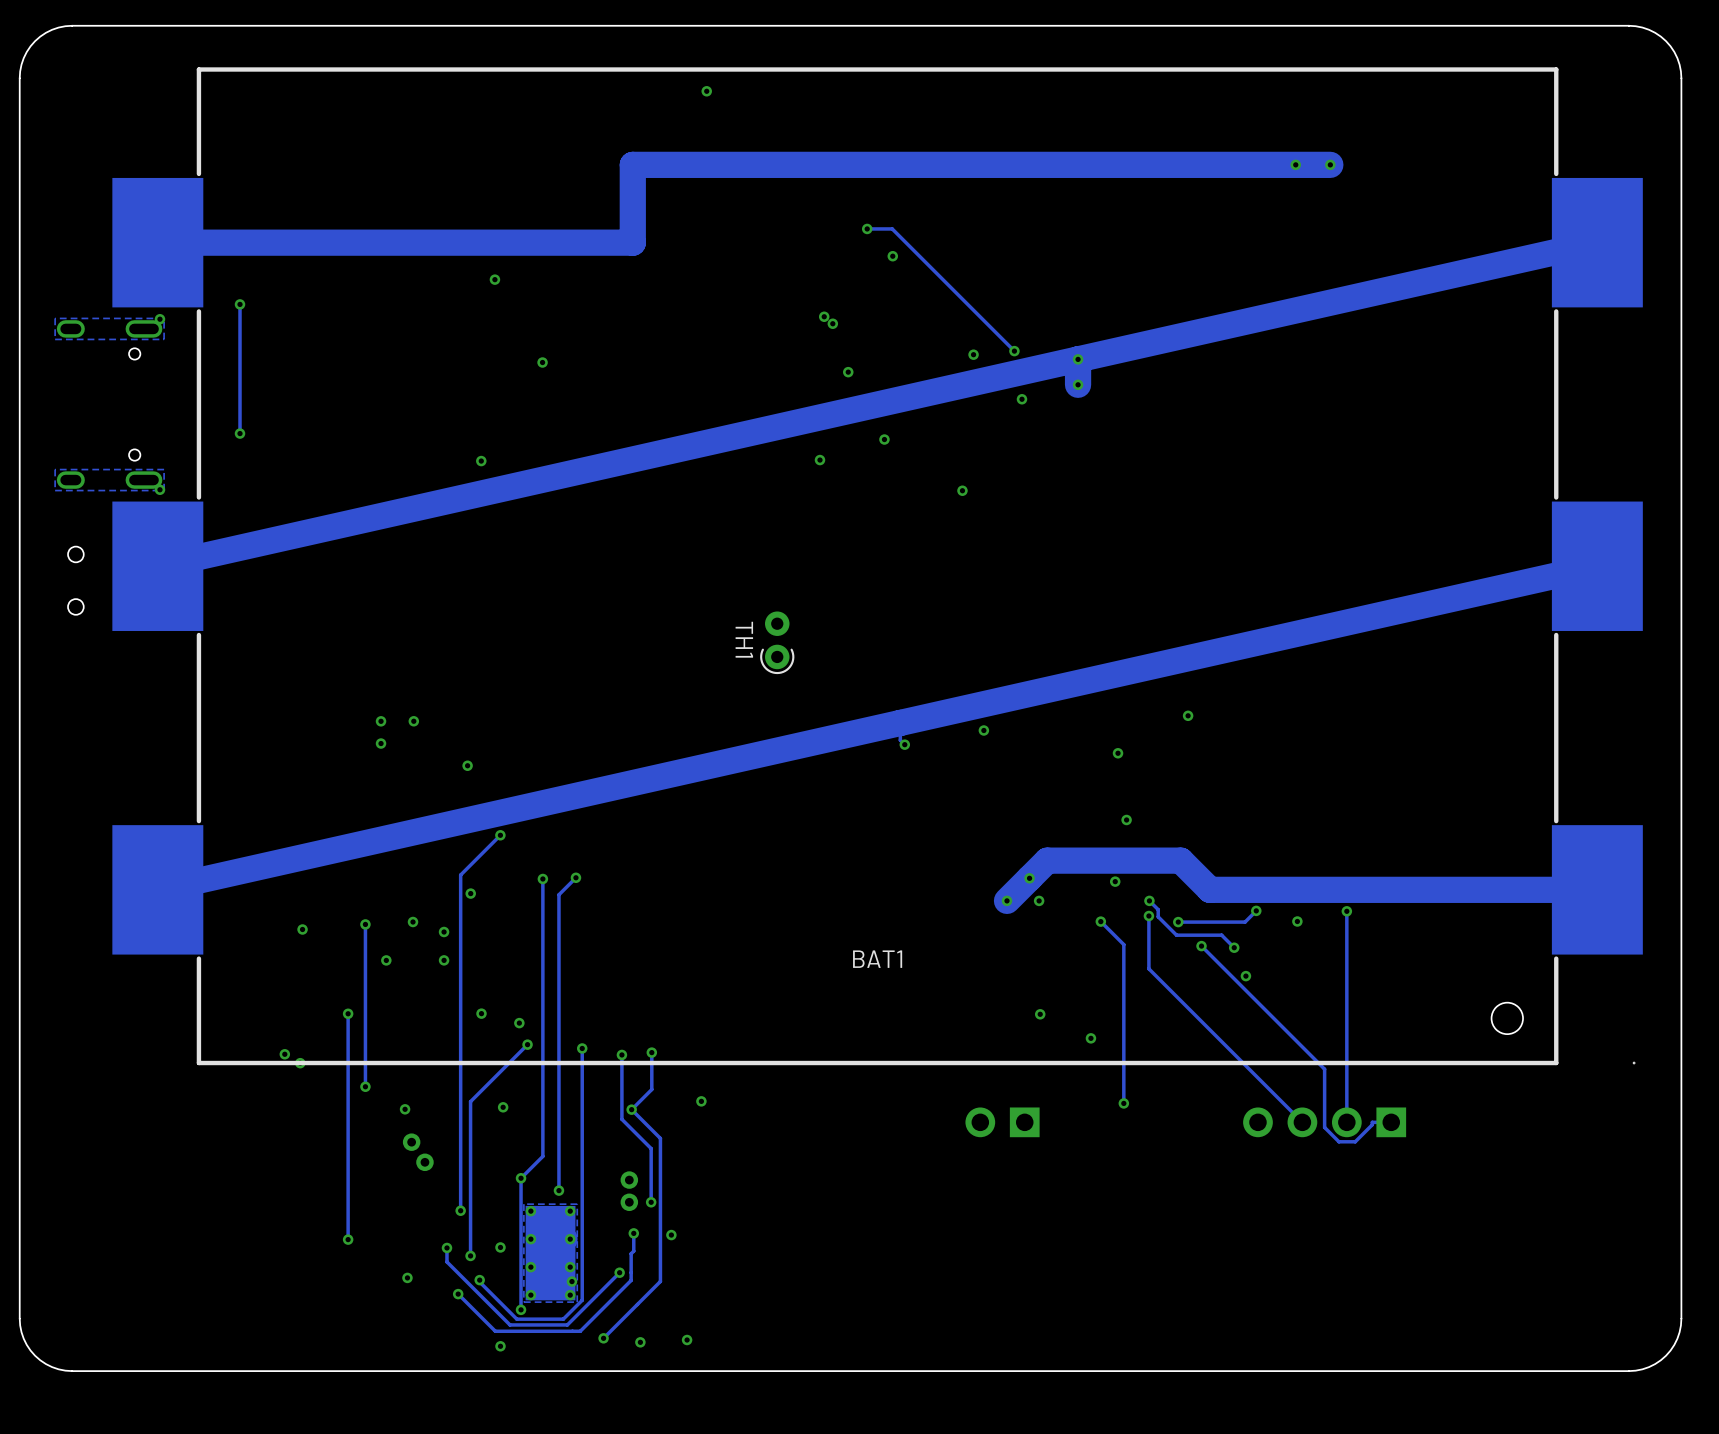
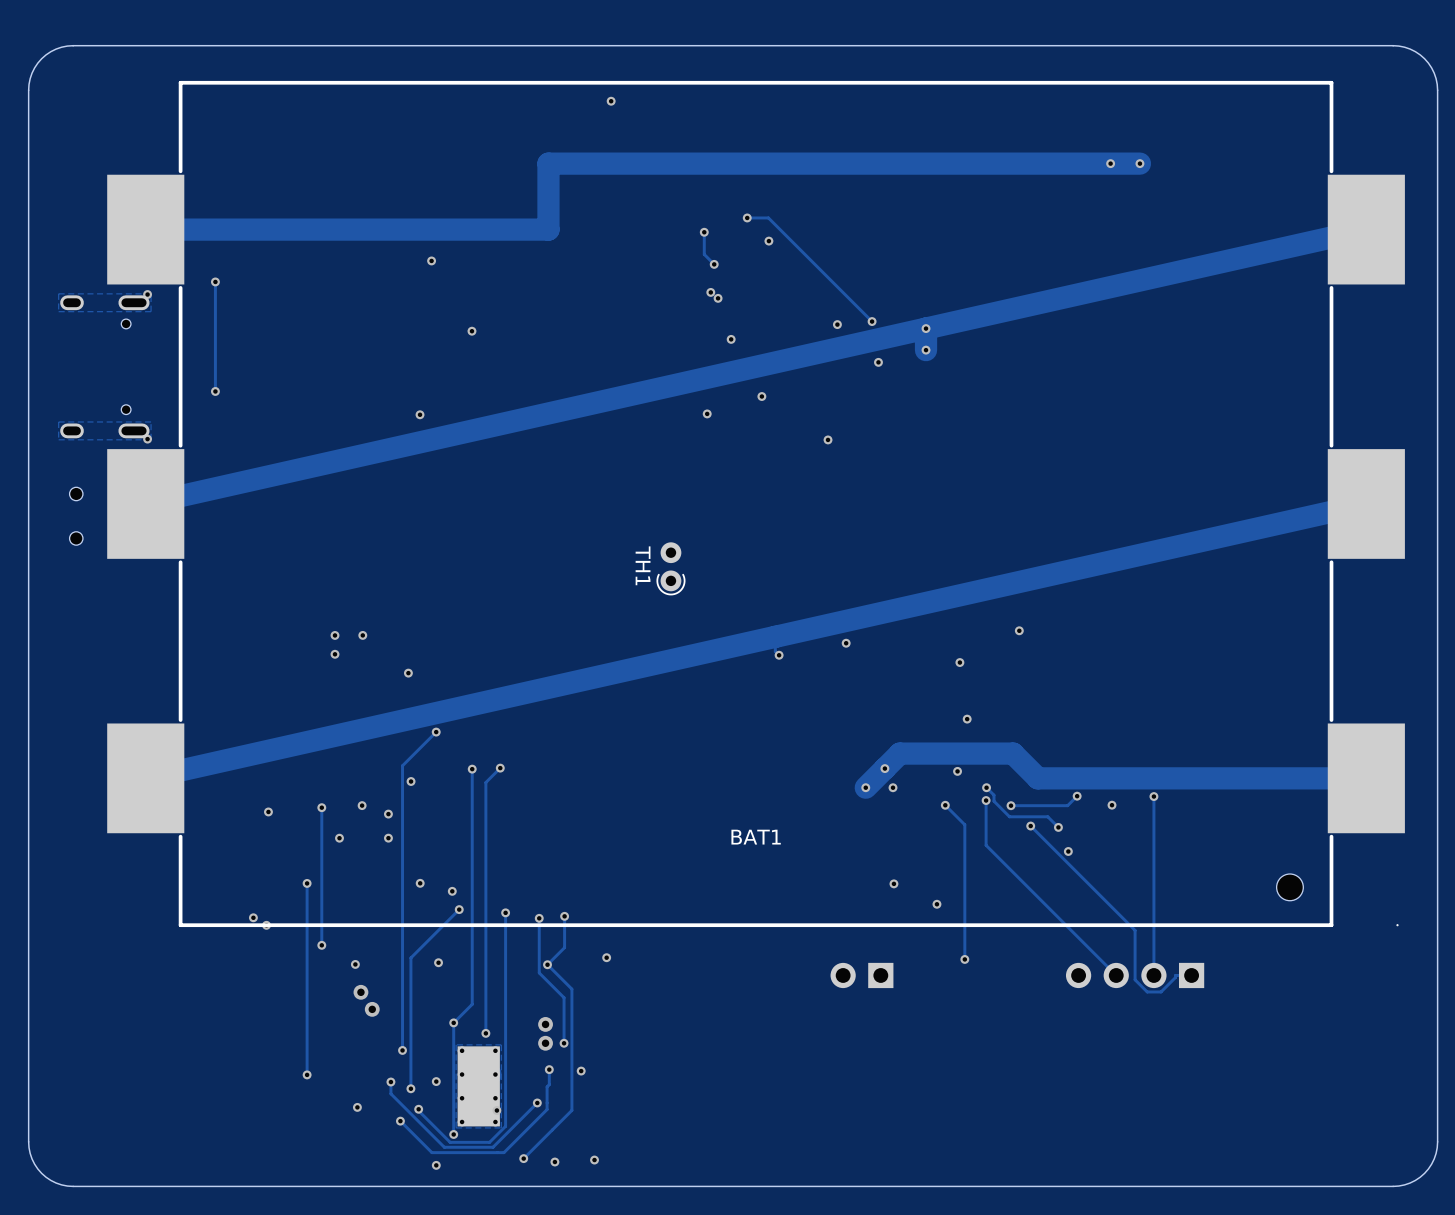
track: none -> (704, 232) (704, 254) (714, 264)
via: none -> (704, 232)
via: none -> (714, 264)

